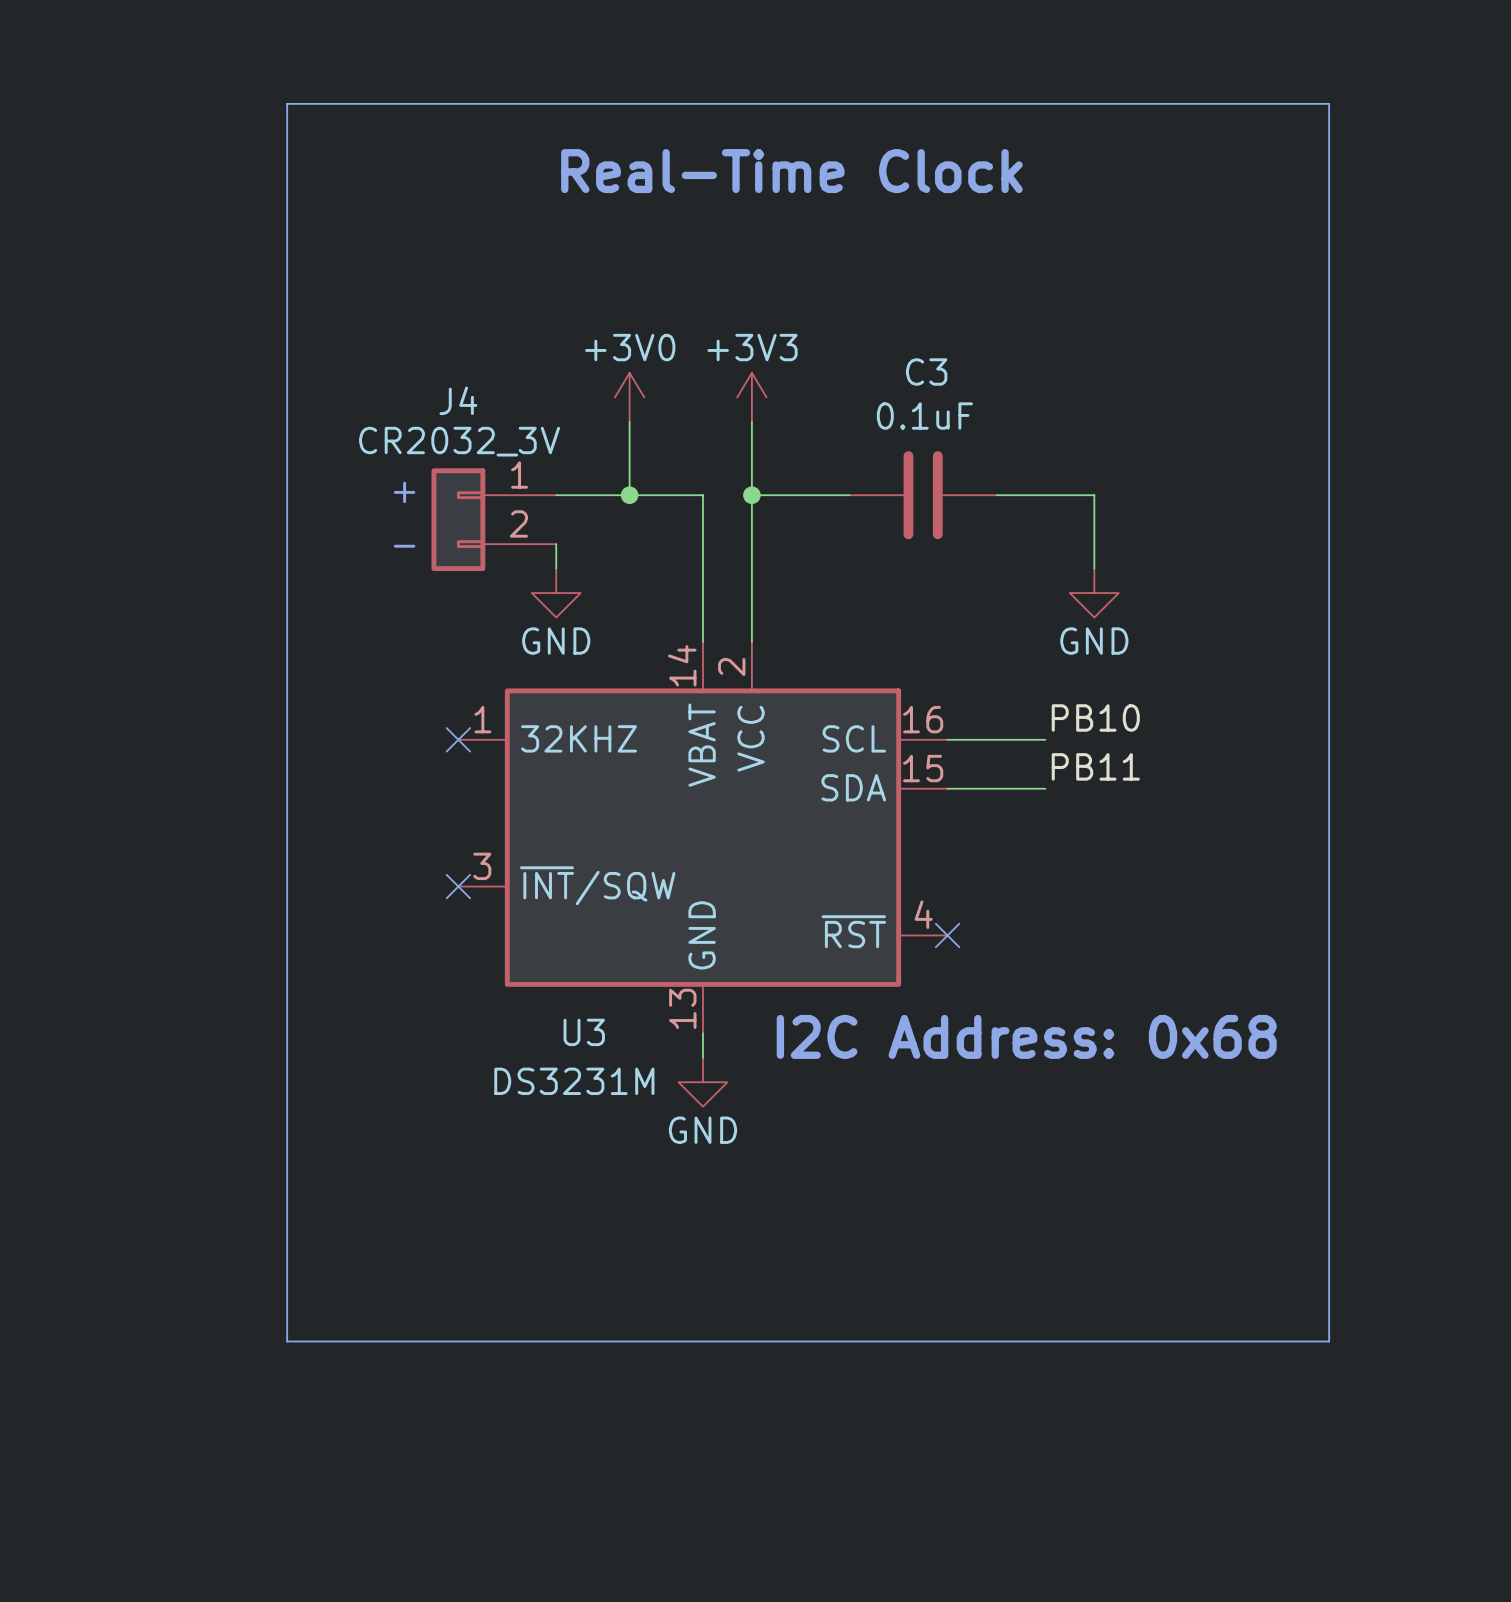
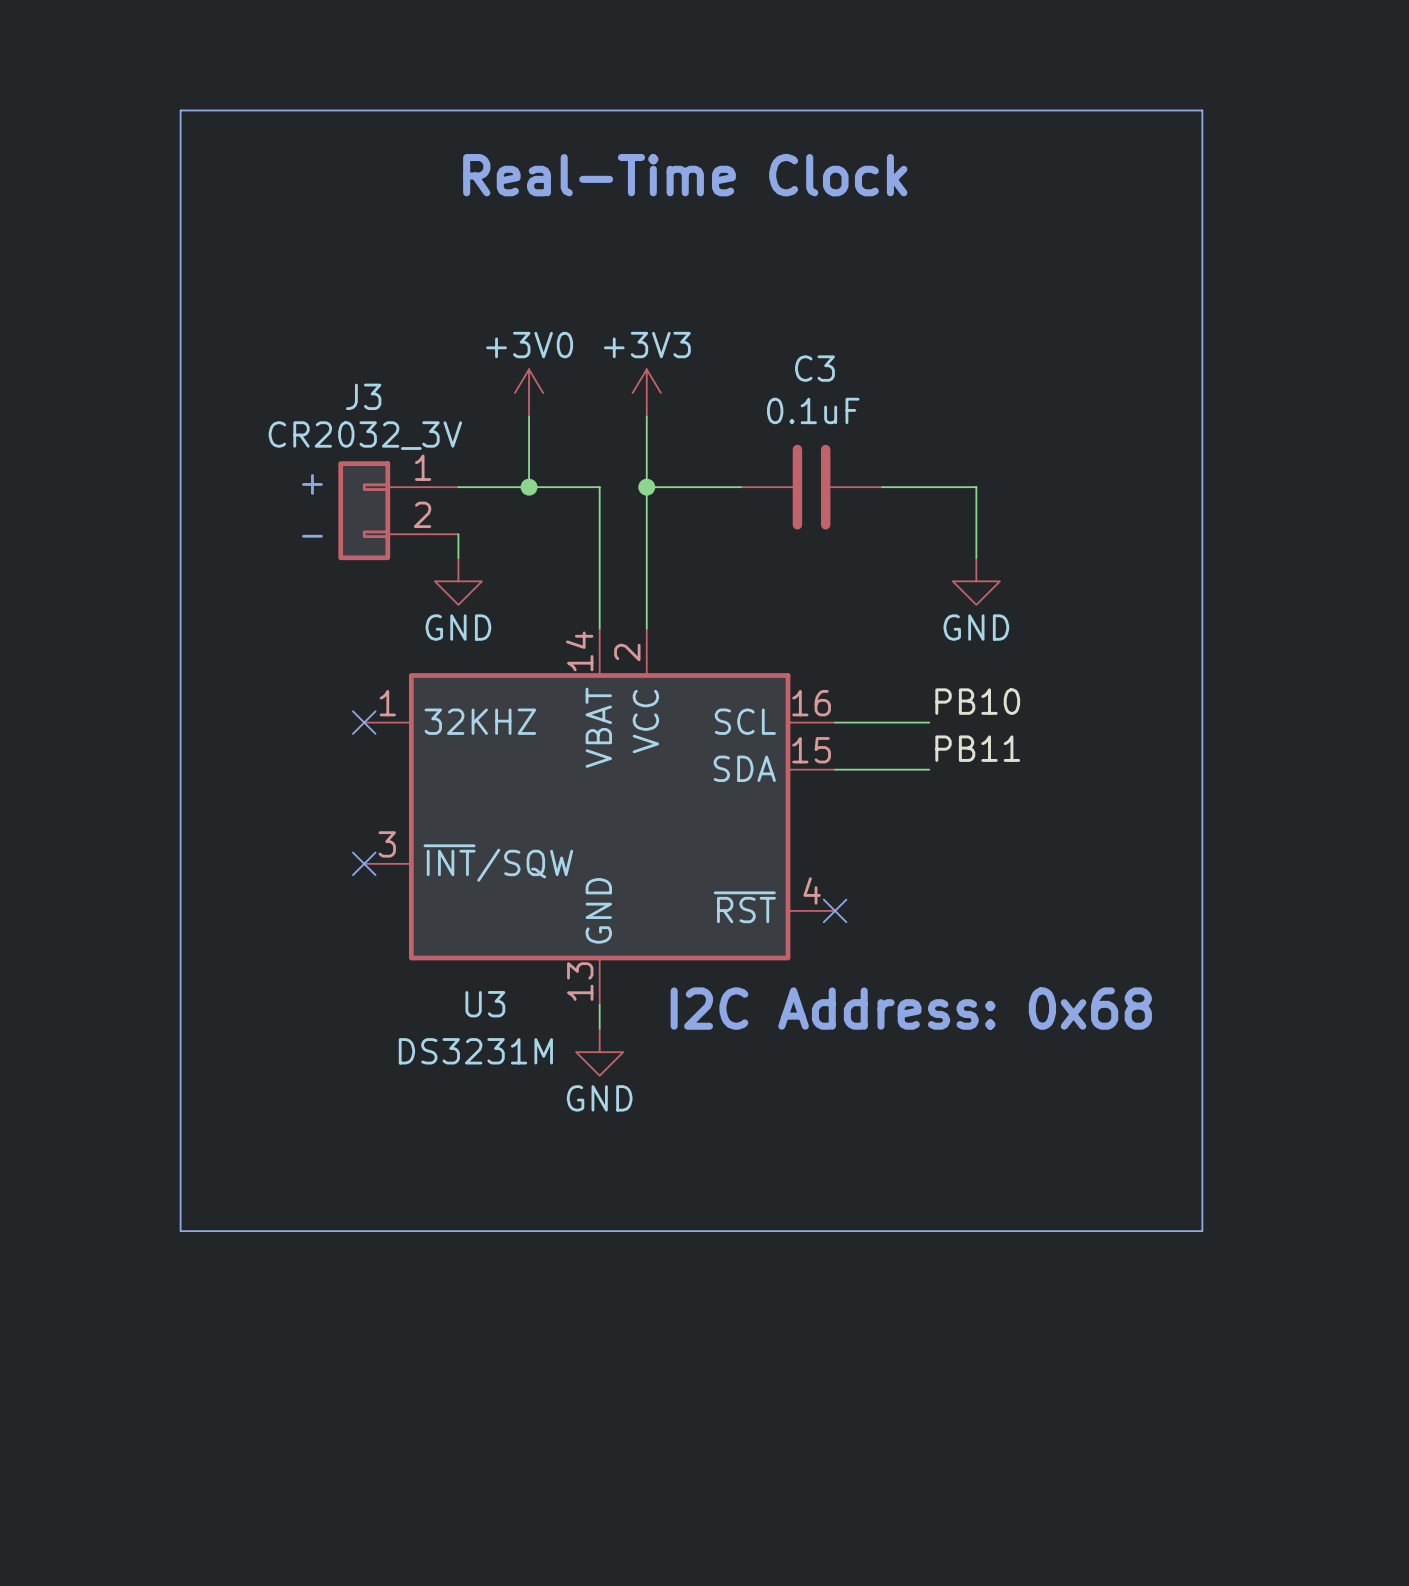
line: (287, 103) (287, 1341) (1329, 1341) (1329, 1268) -> (199, 110) (180, 110) (180, 1231) (1202, 1231)
J4 name: J4 (458, 400) -> J3 (363, 396)

